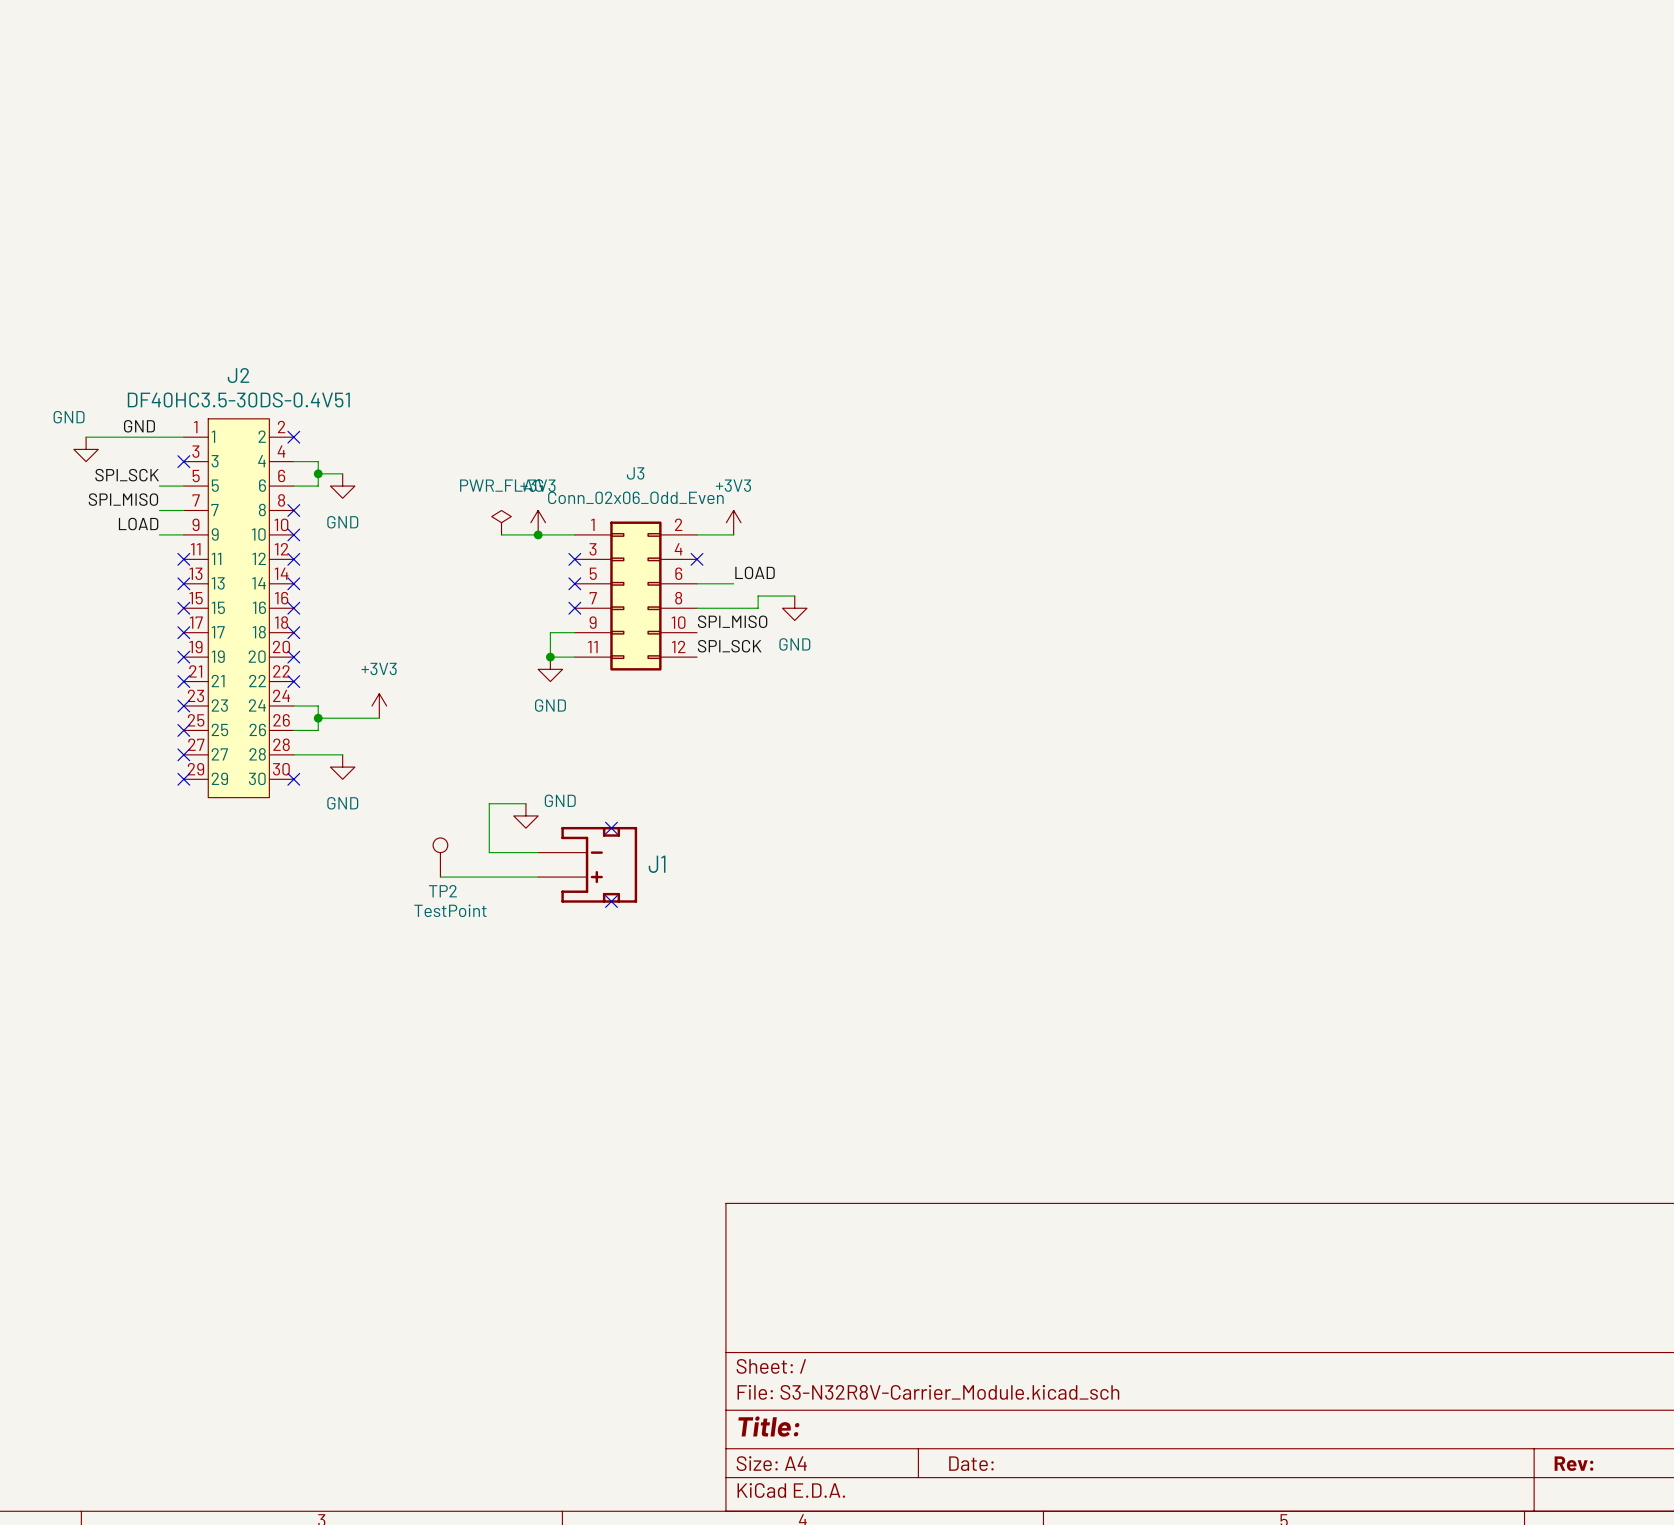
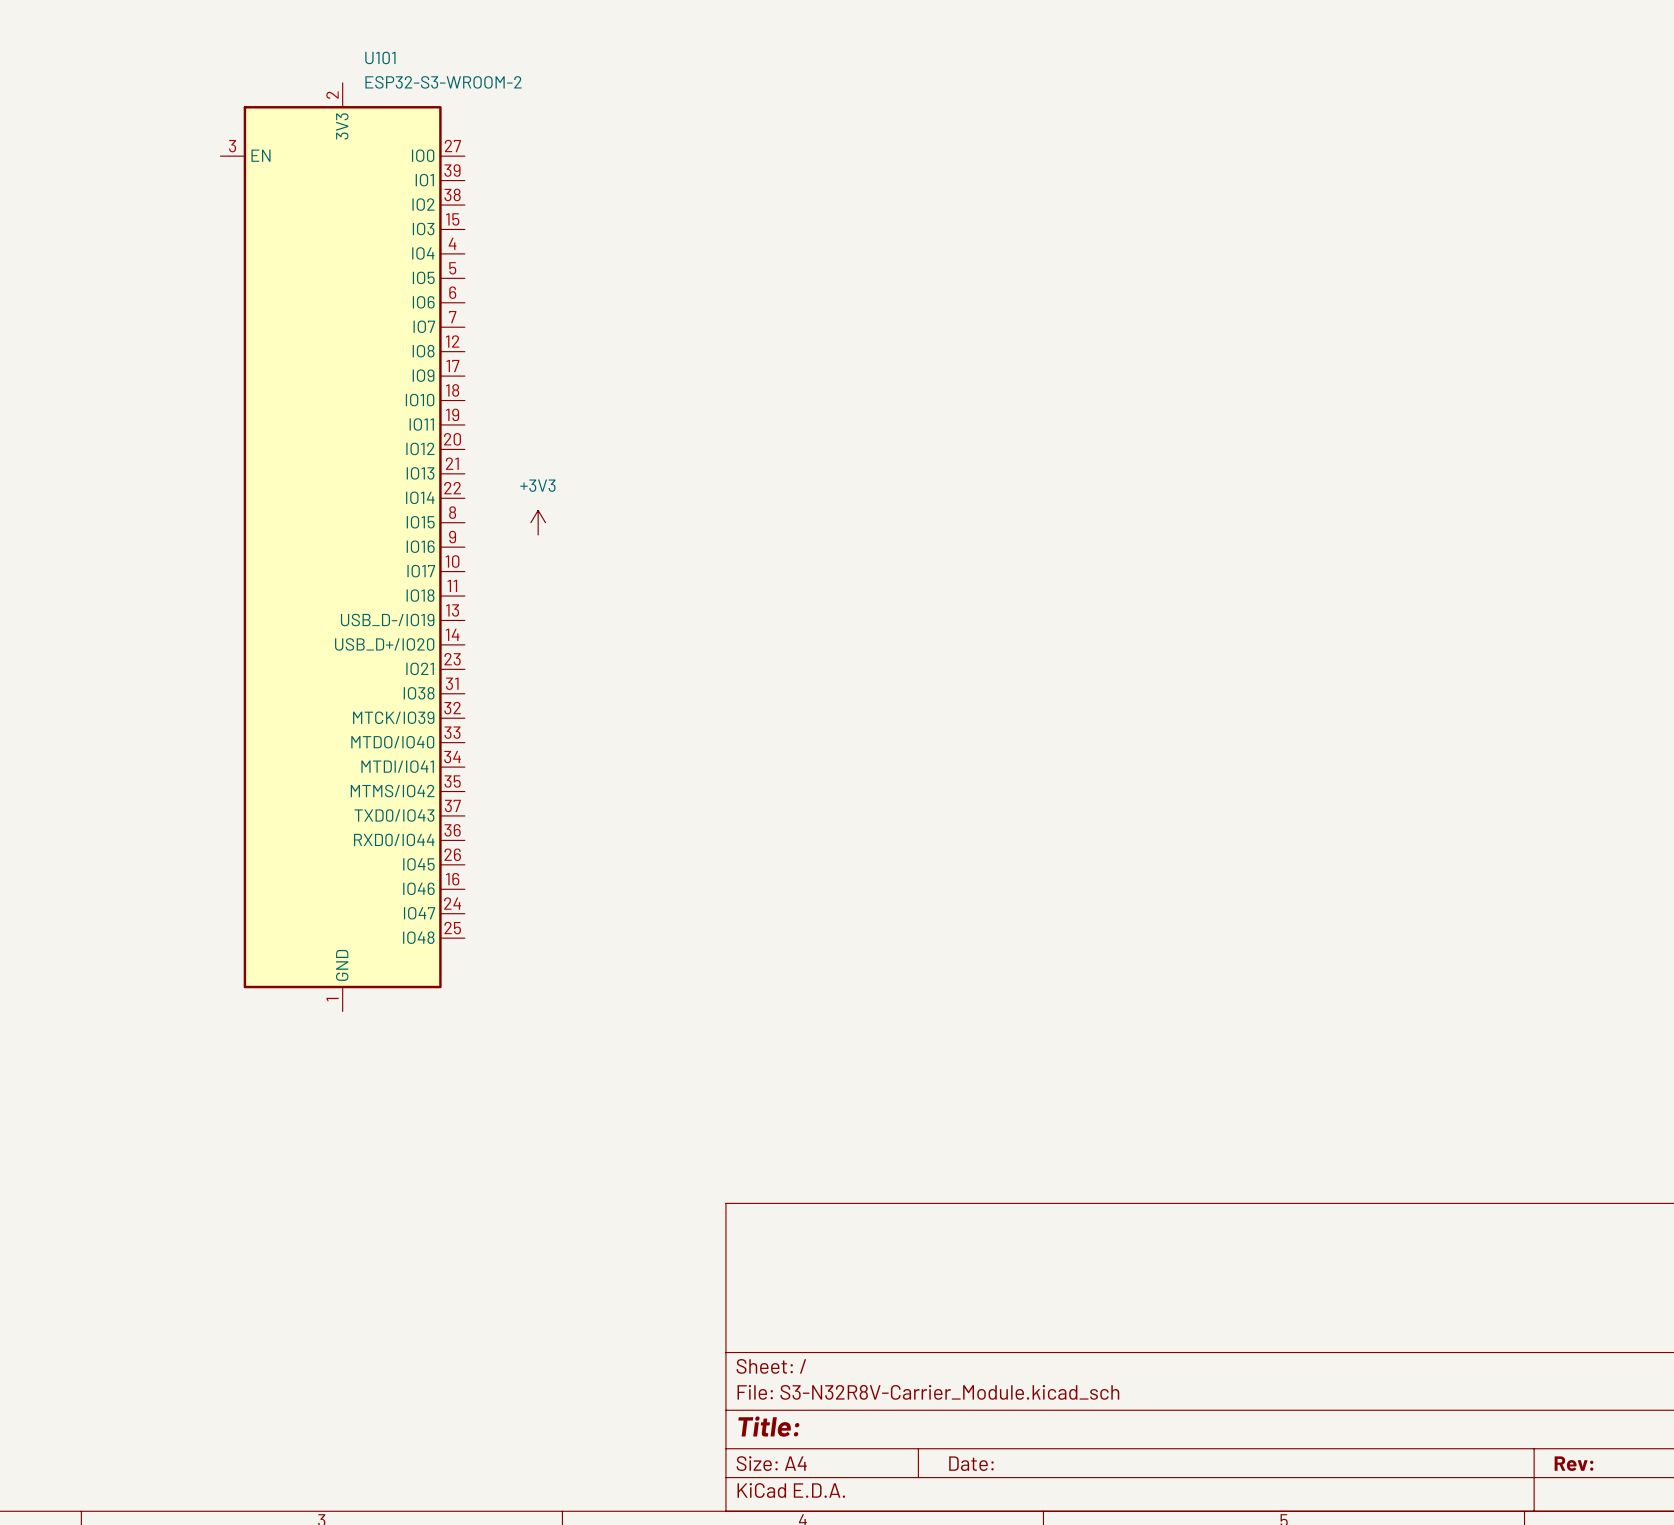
label: GND (139, 426) -> none
wire: (86, 437) (183, 437) -> none
no-connect mark: (293, 437) -> none
power symbol: GND (86, 449) -> none
no-connect mark: (183, 461) -> none
junction: (318, 473) -> none
label: SPI_SCK (127, 475) -> none
wire: (159, 486) (183, 486) -> none
power symbol: GND (342, 486) -> none
label: SPI_MISO (123, 499) -> none
wire: (159, 510) (183, 510) -> none
no-connect mark: (293, 510) -> none
power symbol: PWR_FLAG (501, 522) -> none
power symbol: +3V3 (733, 522) -> none
label: LOAD (138, 524) -> none
wire: (159, 534) (183, 534) -> none
no-connect mark: (293, 534) -> none
wire: (501, 534) (574, 534) -> none
junction: (538, 534) -> none
wire: (697, 534) (733, 534) -> none
U101: none -> ESP32-S3-WROOM-2 (342, 547)
no-connect mark: (183, 559) -> none
no-connect mark: (293, 559) -> none
no-connect mark: (574, 559) -> none
no-connect mark: (697, 559) -> none
label: LOAD (755, 572) -> none
no-connect mark: (183, 583) -> none
no-connect mark: (293, 583) -> none
no-connect mark: (574, 583) -> none
wire: (697, 583) (733, 583) -> none
J3: Conn_02x06_Odd_Even (635, 596) -> none
wire: (794, 596) (758, 596) (758, 608) (697, 608) -> none
no-connect mark: (183, 608) -> none
J2: DF40HC3.5-30DS-0.4V51 (238, 608) -> none
no-connect mark: (293, 608) -> none
no-connect mark: (574, 608) -> none
power symbol: GND (794, 608) -> none
label: SPI_MISO (732, 621) -> none
no-connect mark: (183, 632) -> none
no-connect mark: (293, 632) -> none
wire: (574, 632) (550, 632) (550, 657) (574, 657) -> none
label: SPI_SCK (729, 646) -> none
no-connect mark: (183, 657) -> none
no-connect mark: (293, 657) -> none
junction: (550, 657) -> none
power symbol: GND (550, 669) -> none
no-connect mark: (183, 681) -> none
no-connect mark: (293, 681) -> none
no-connect mark: (183, 705) -> none
power symbol: +3V3 (379, 705) -> none
junction: (318, 718) -> none
no-connect mark: (183, 730) -> none
no-connect mark: (183, 754) -> none
power symbol: GND (342, 767) -> none
no-connect mark: (183, 779) -> none
no-connect mark: (293, 779) -> none
wire: (525, 803) (489, 803) (489, 852) (538, 852) -> none
power symbol: GND (525, 815) -> none
no-connect mark: (611, 828) -> none
TP2: TestPoint (440, 857) -> none
J1: (587, 864) -> none
wire: (440, 877) (538, 877) -> none
no-connect mark: (611, 901) -> none

